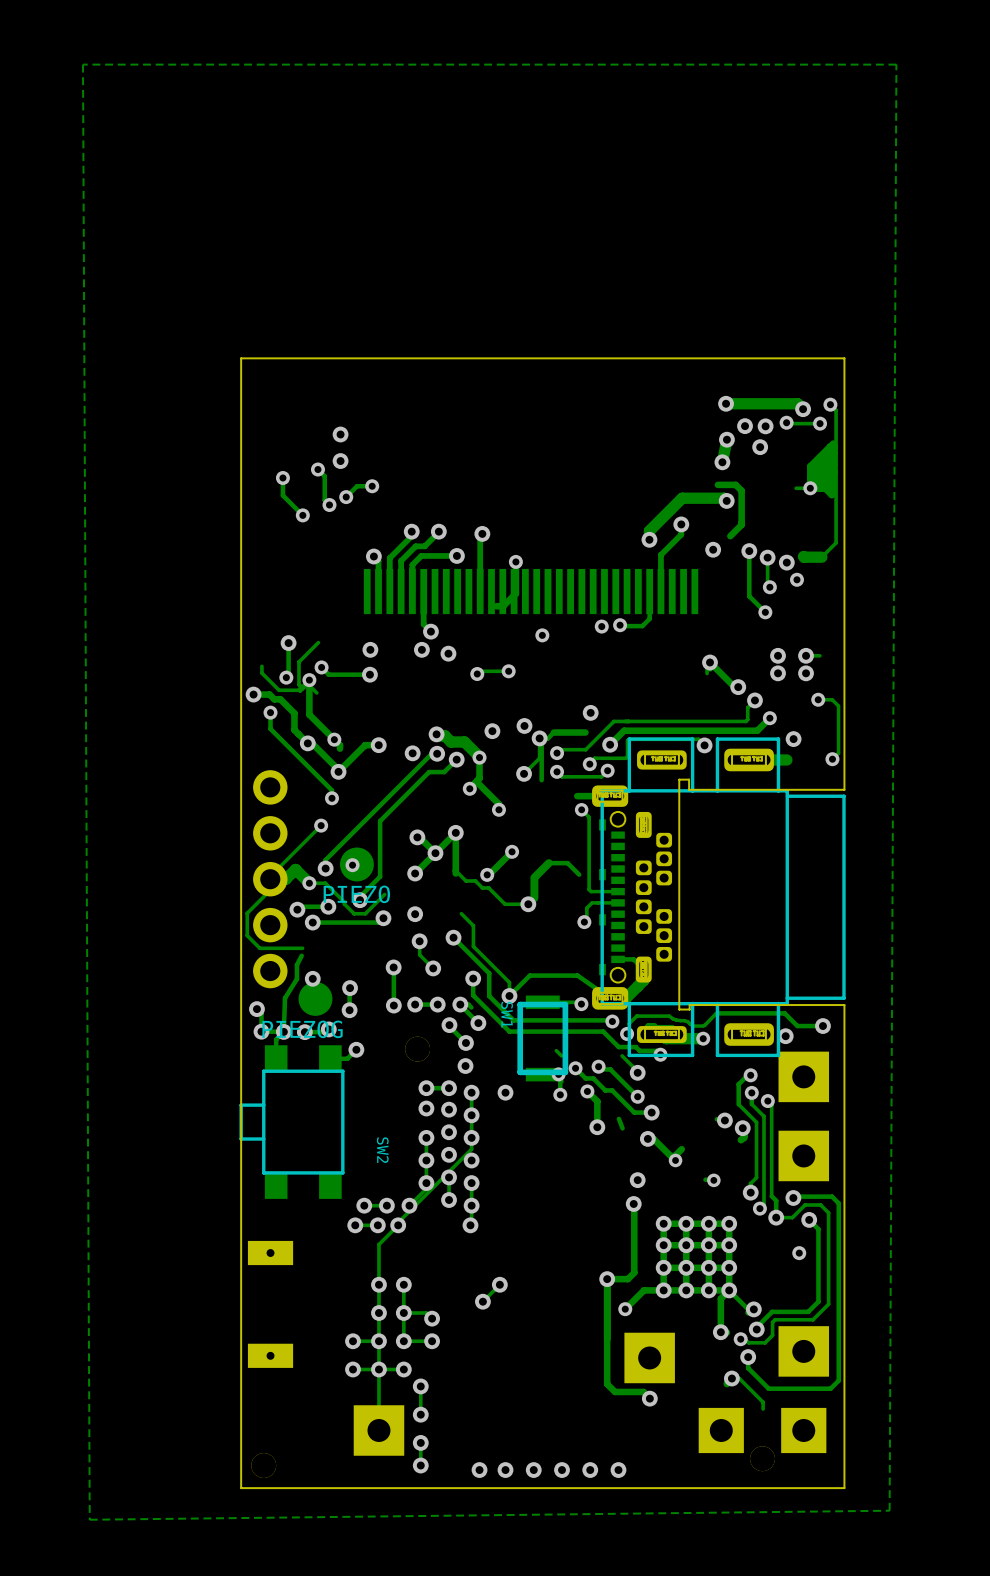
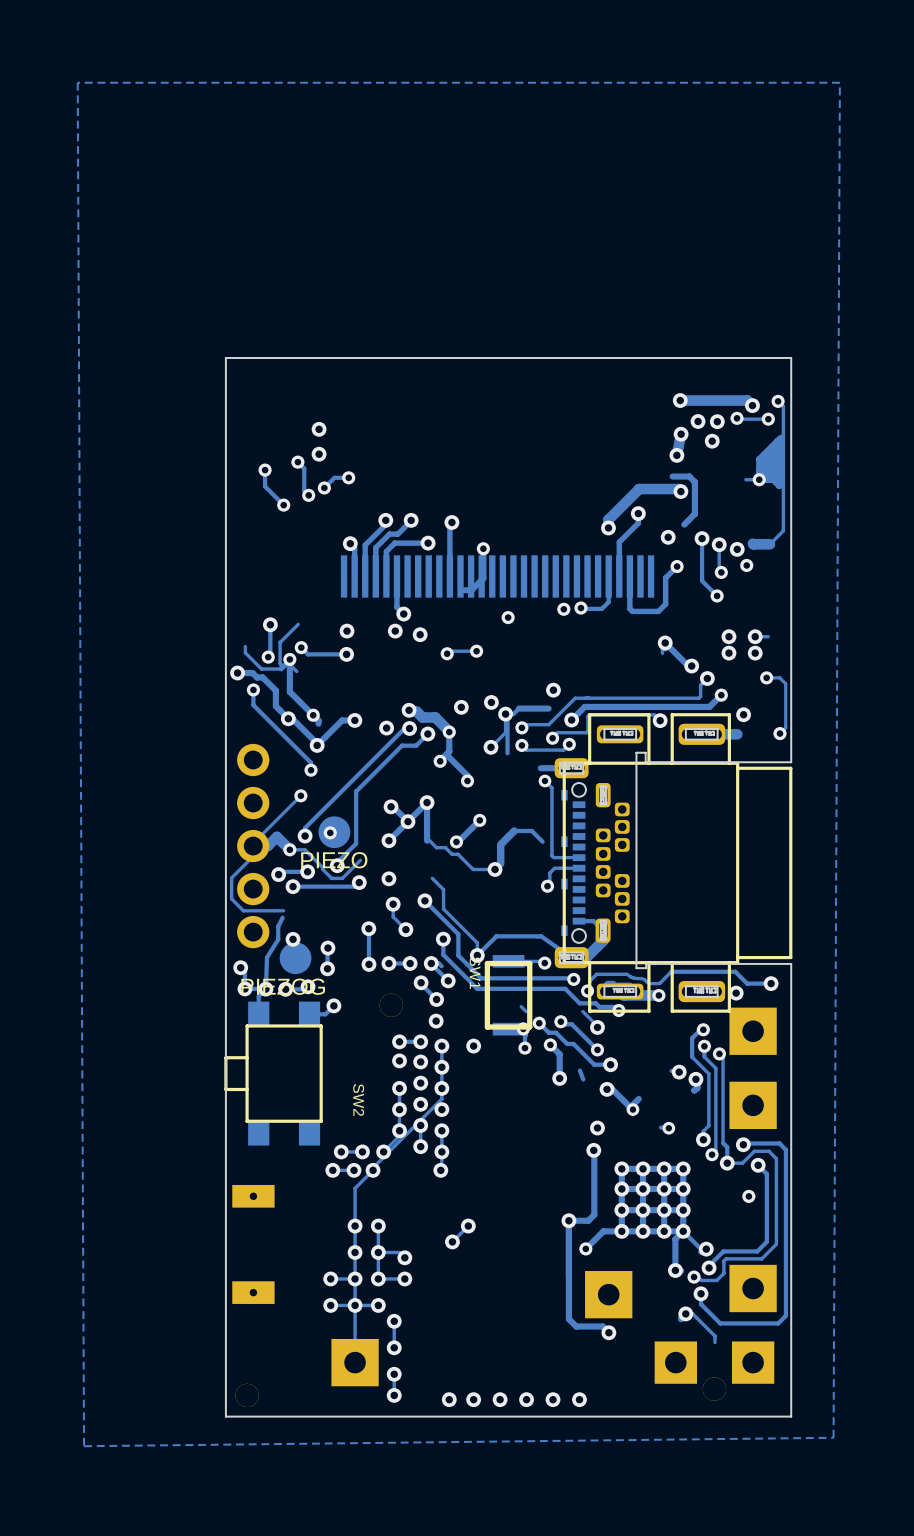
track: none -> (677, 566) (665, 577) (665, 604) (658, 611) (632, 611) (629, 608) (629, 576)
via: none -> (677, 566)

